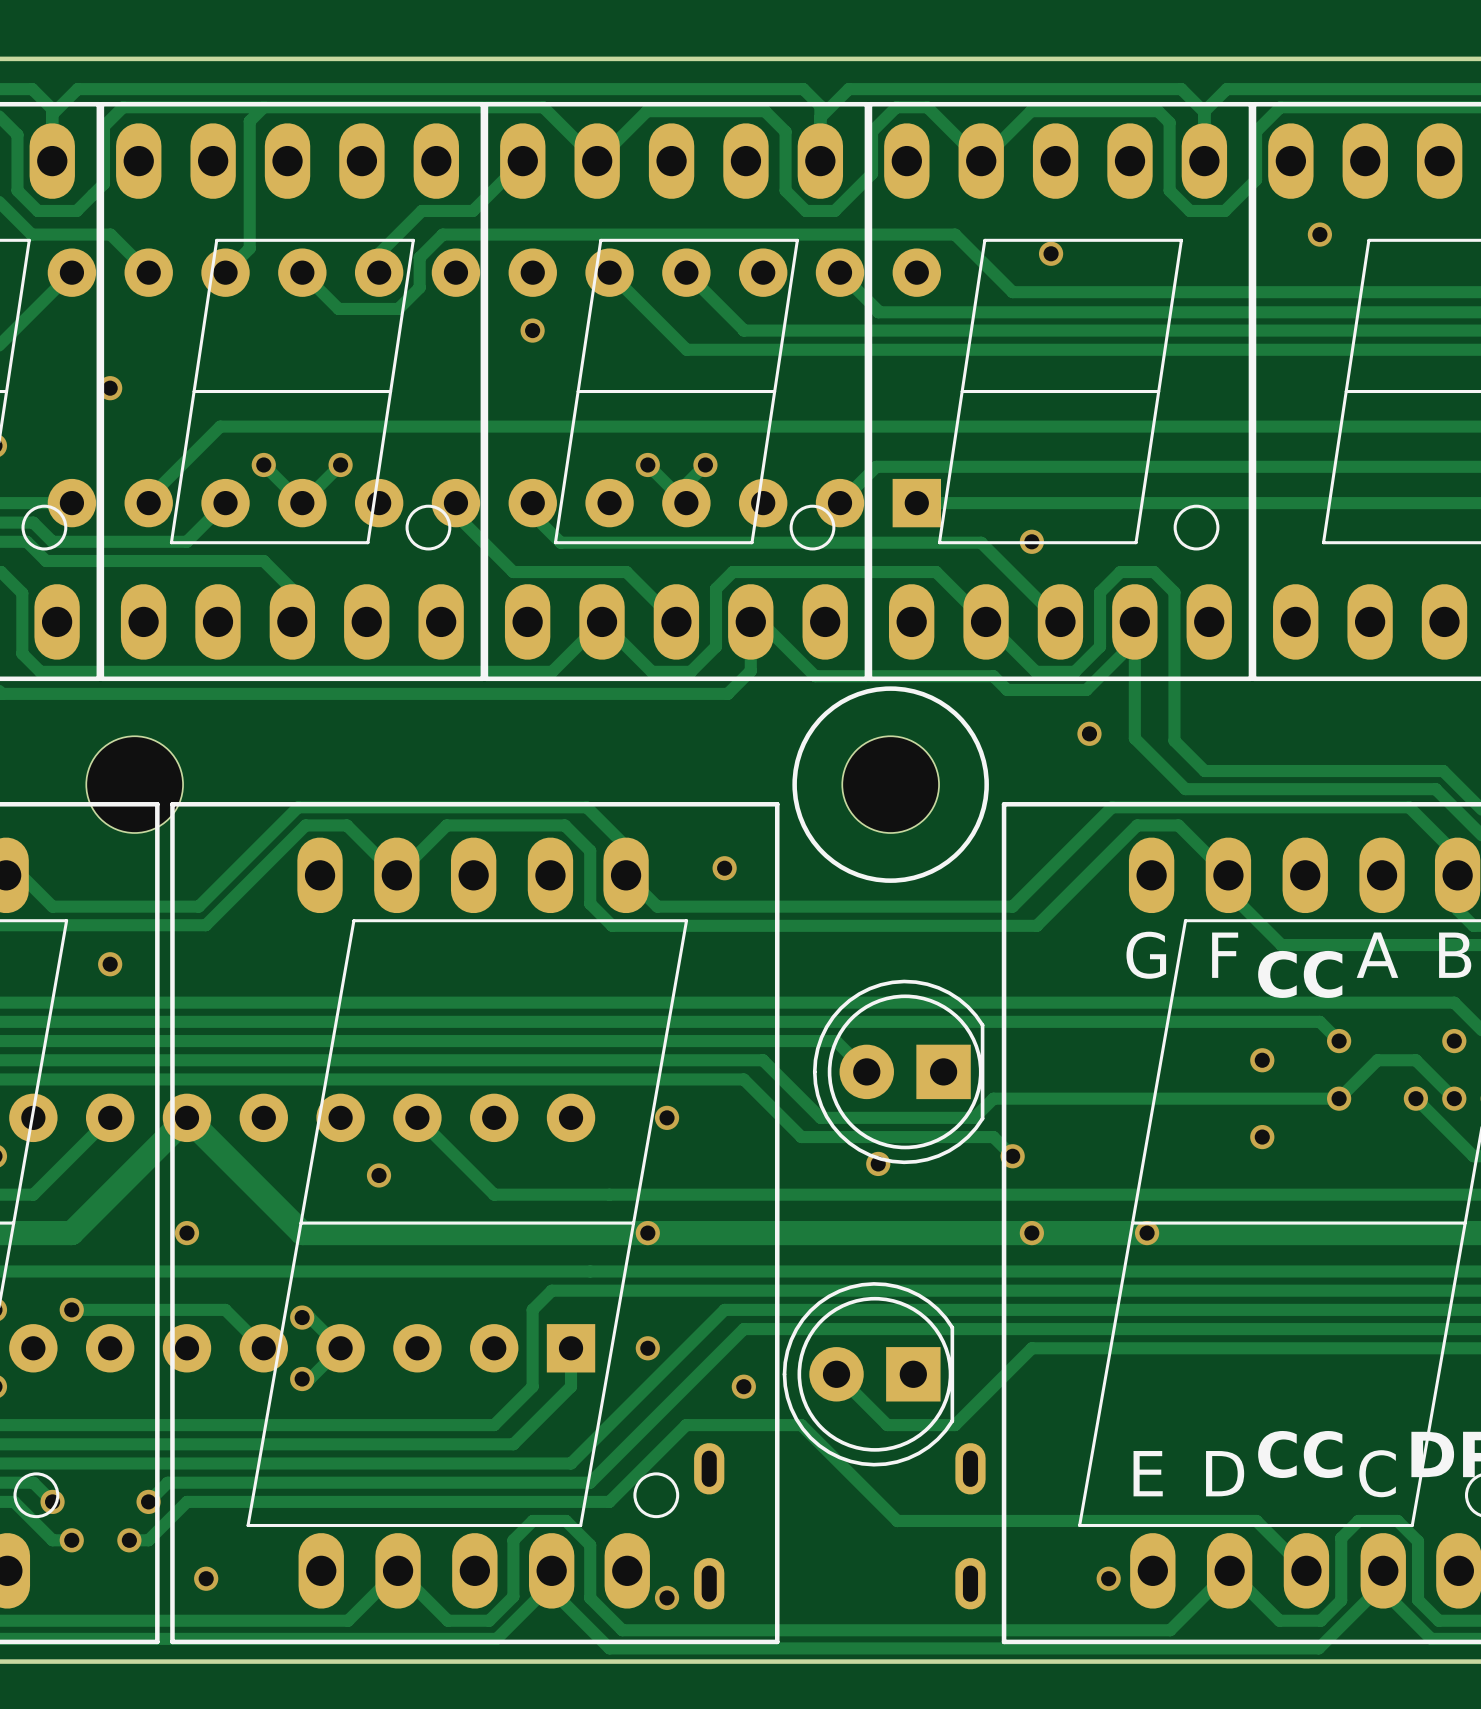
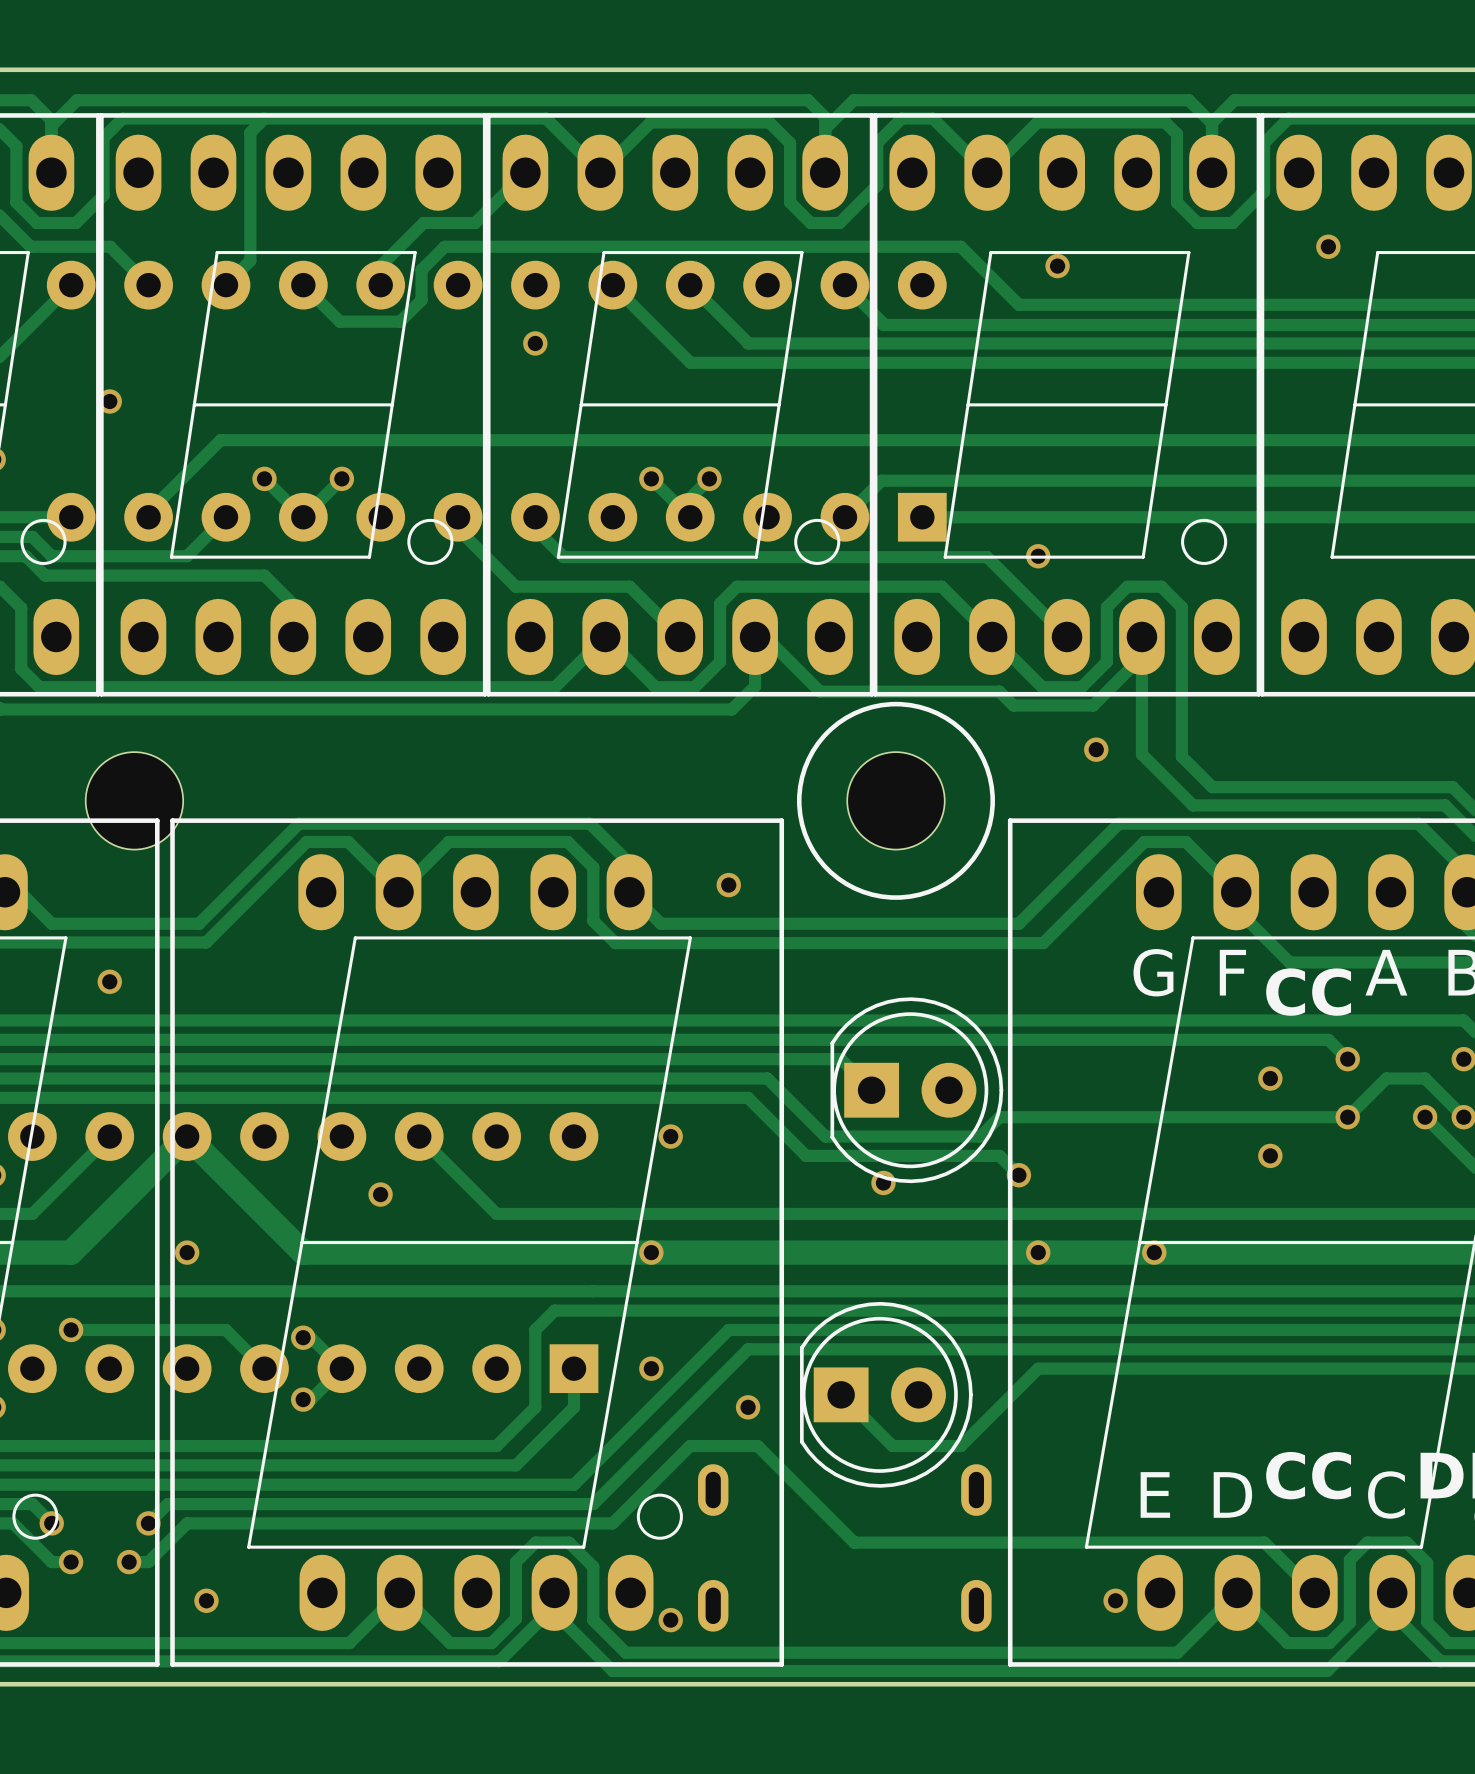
part rotation: 0° (898, 1071) -> 180° (916, 1090)
part rotation: 0° (868, 1374) -> 180° (886, 1394)
track: (753, 1425) (801, 1425) (897, 1521) -> (757, 1446) (854, 1542)
track: none -> (854, 1542) (902, 1542)

